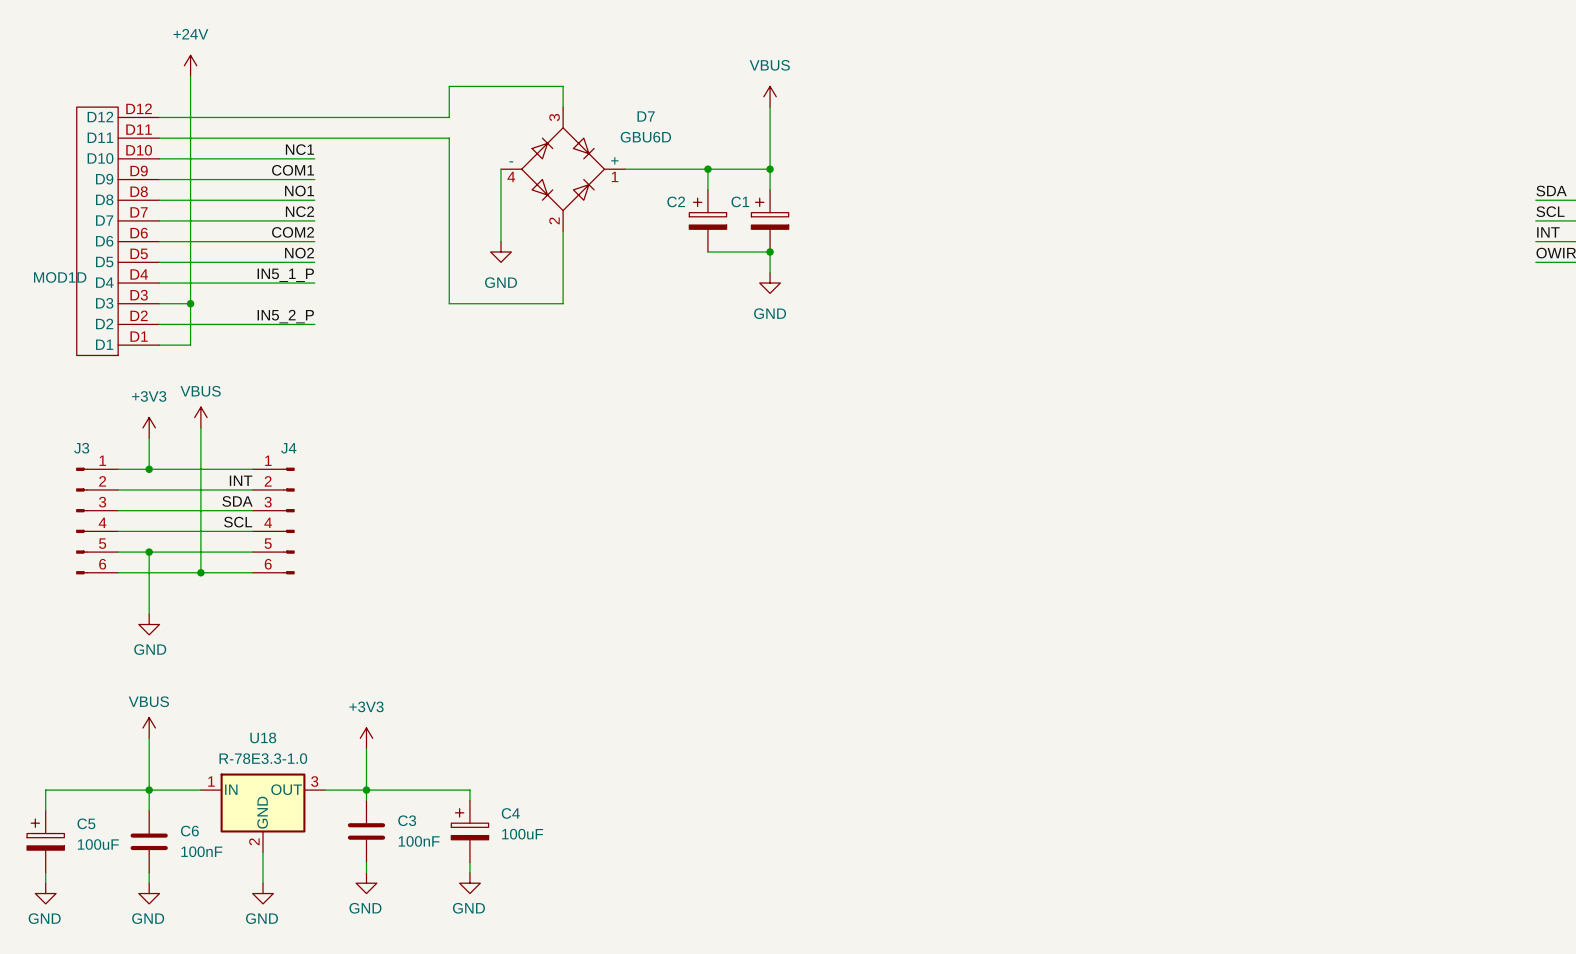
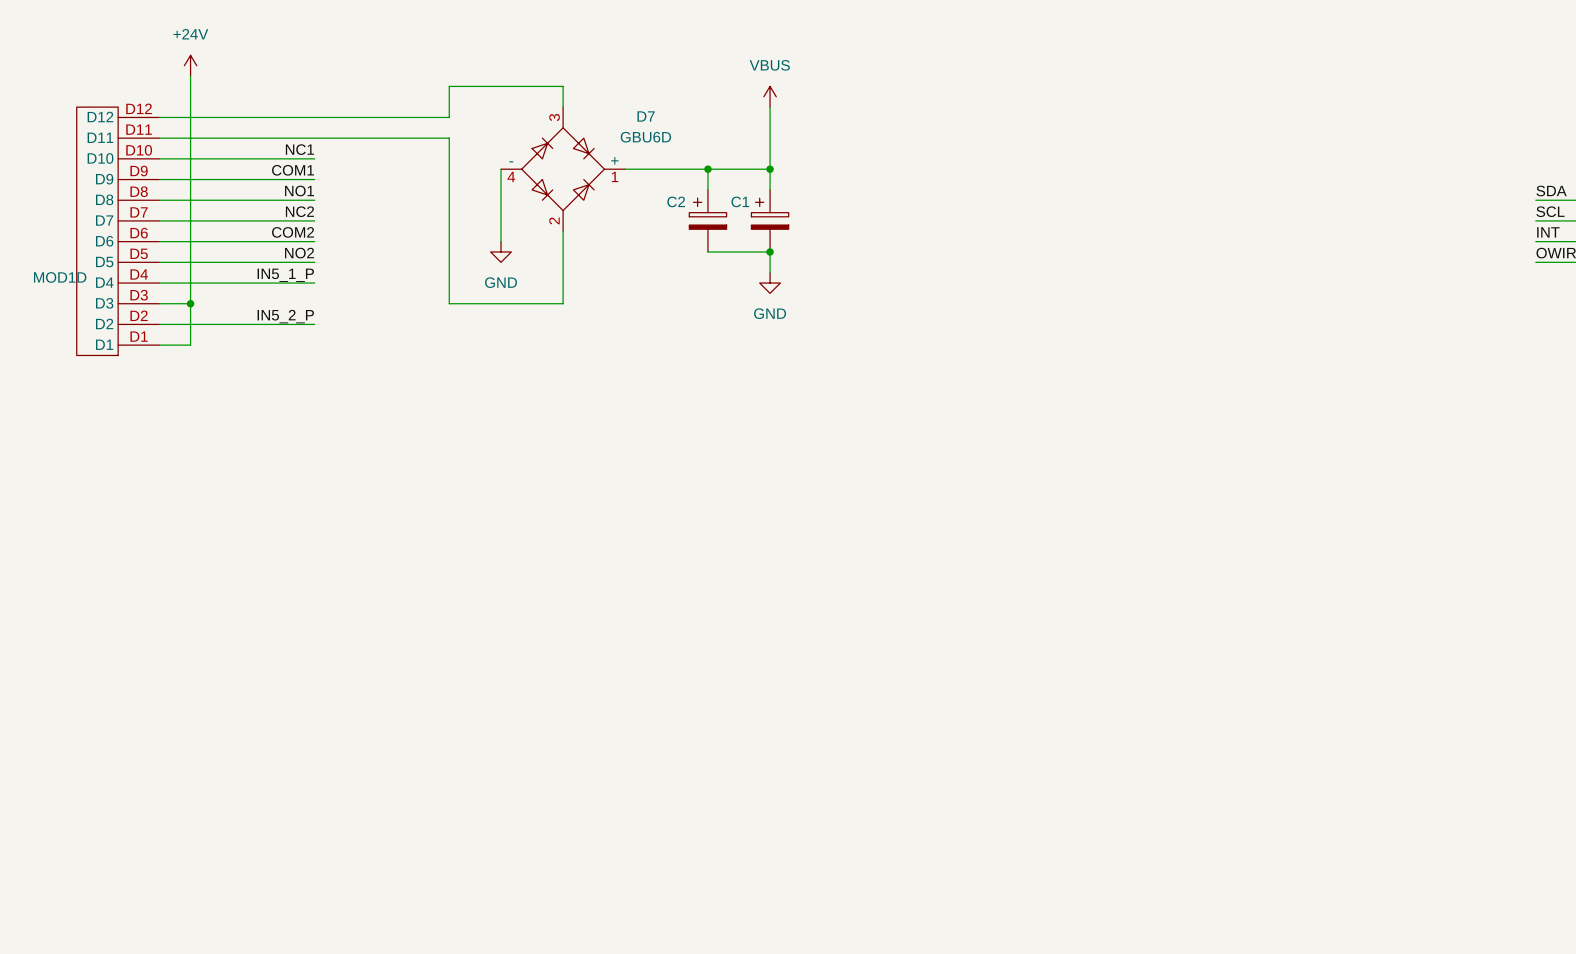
power symbol: VBUS (200, 417) -> none
power symbol: +3V3 (149, 427) -> none
wire: (200, 427) (200, 572) -> none
wire: (149, 438) (149, 469) -> none
wire: (118, 469) (252, 469) -> none
junction: (149, 469) -> none
label: INT (241, 480) -> none
wire: (118, 489) (252, 489) -> none
label: SDA (237, 501) -> none
wire: (118, 510) (252, 510) -> none
J3: (97, 521) -> none
J4: (273, 521) -> none
label: SCL (238, 522) -> none
wire: (118, 531) (252, 531) -> none
wire: (118, 552) (252, 552) -> none
wire: (149, 552) (149, 614) -> none
junction: (149, 552) -> none
wire: (118, 572) (252, 572) -> none
junction: (200, 572) -> none
power symbol: GND (149, 624) -> none
power symbol: VBUS (149, 727) -> none
wire: (149, 738) (149, 810) -> none
power symbol: +3V3 (366, 738) -> none
wire: (366, 748) (366, 800) -> none
junction: (149, 790) -> none
wire: (200, 790) (45, 790) (45, 810) -> none
wire: (325, 790) (469, 790) (469, 800) -> none
junction: (366, 790) -> none
U18: R-78E3.3-1.0 (263, 812) -> none
C3: 100nF (366, 831) -> none
C4: 100uF (469, 831) -> none
C5: 100uF (45, 841) -> none
C6: 100nF (149, 841) -> none
wire: (263, 852) (263, 883) -> none
wire: (366, 862) (366, 872) -> none
wire: (469, 862) (469, 872) -> none
wire: (45, 872) (45, 883) -> none
wire: (149, 872) (149, 883) -> none
power symbol: GND (366, 883) -> none
power symbol: GND (469, 883) -> none
power symbol: GND (45, 893) -> none
power symbol: GND (149, 893) -> none
power symbol: GND (263, 893) -> none

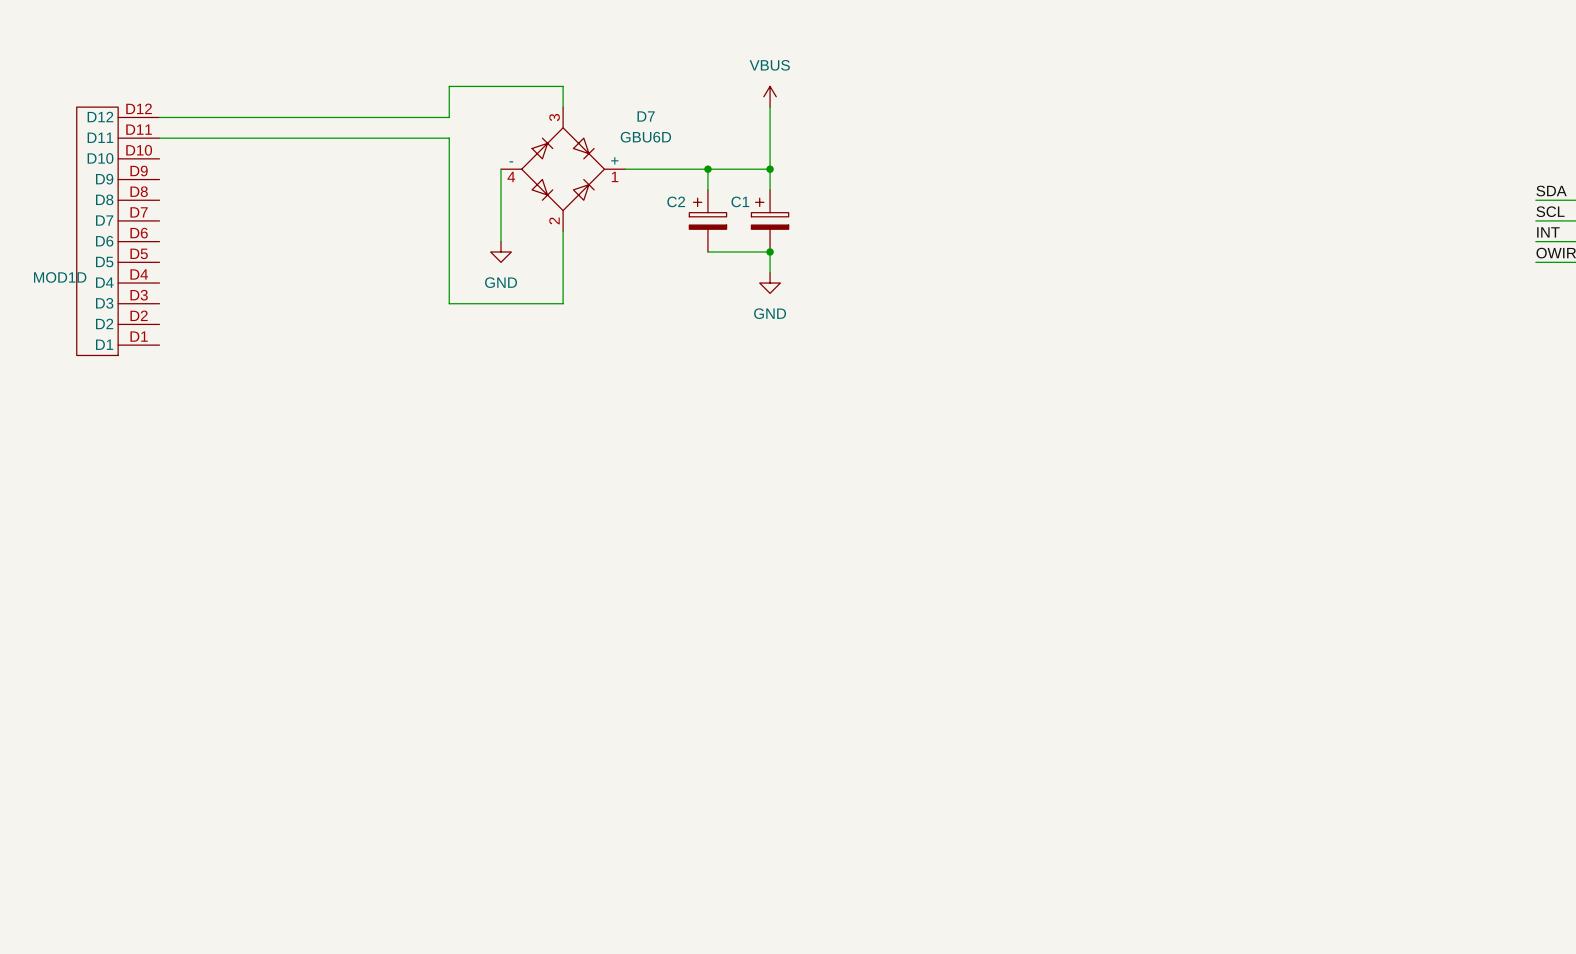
power symbol: +24V (190, 65) -> none
wire: (190, 76) (190, 345) (159, 345) -> none
label: NC1 (299, 149) -> none
wire: (159, 158) (314, 158) -> none
label: COM1 (293, 170) -> none
wire: (159, 179) (314, 179) -> none
label: NO1 (299, 191) -> none
wire: (159, 200) (314, 200) -> none
label: NC2 (299, 211) -> none
wire: (159, 220) (314, 220) -> none
label: COM2 (293, 232) -> none
wire: (159, 241) (314, 241) -> none
label: NO2 (299, 253) -> none
wire: (159, 262) (314, 262) -> none
label: IN5_1_P (285, 275) -> none
wire: (159, 283) (314, 283) -> none
wire: (159, 303) (190, 303) -> none
junction: (190, 303) -> none
label: IN5_2_P (285, 316) -> none
wire: (159, 324) (314, 324) -> none

